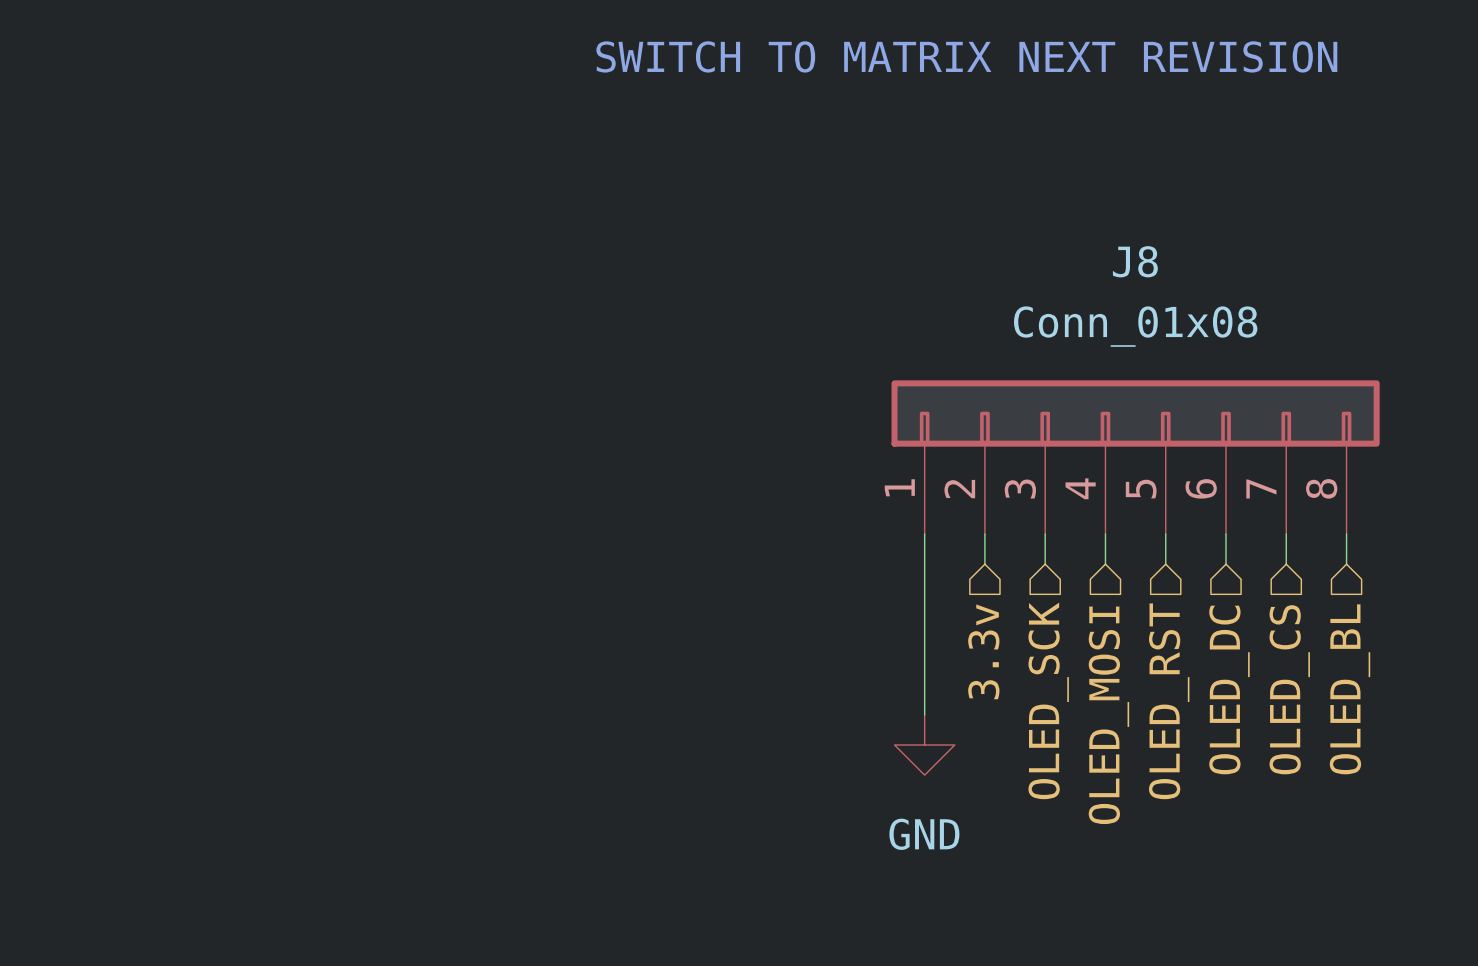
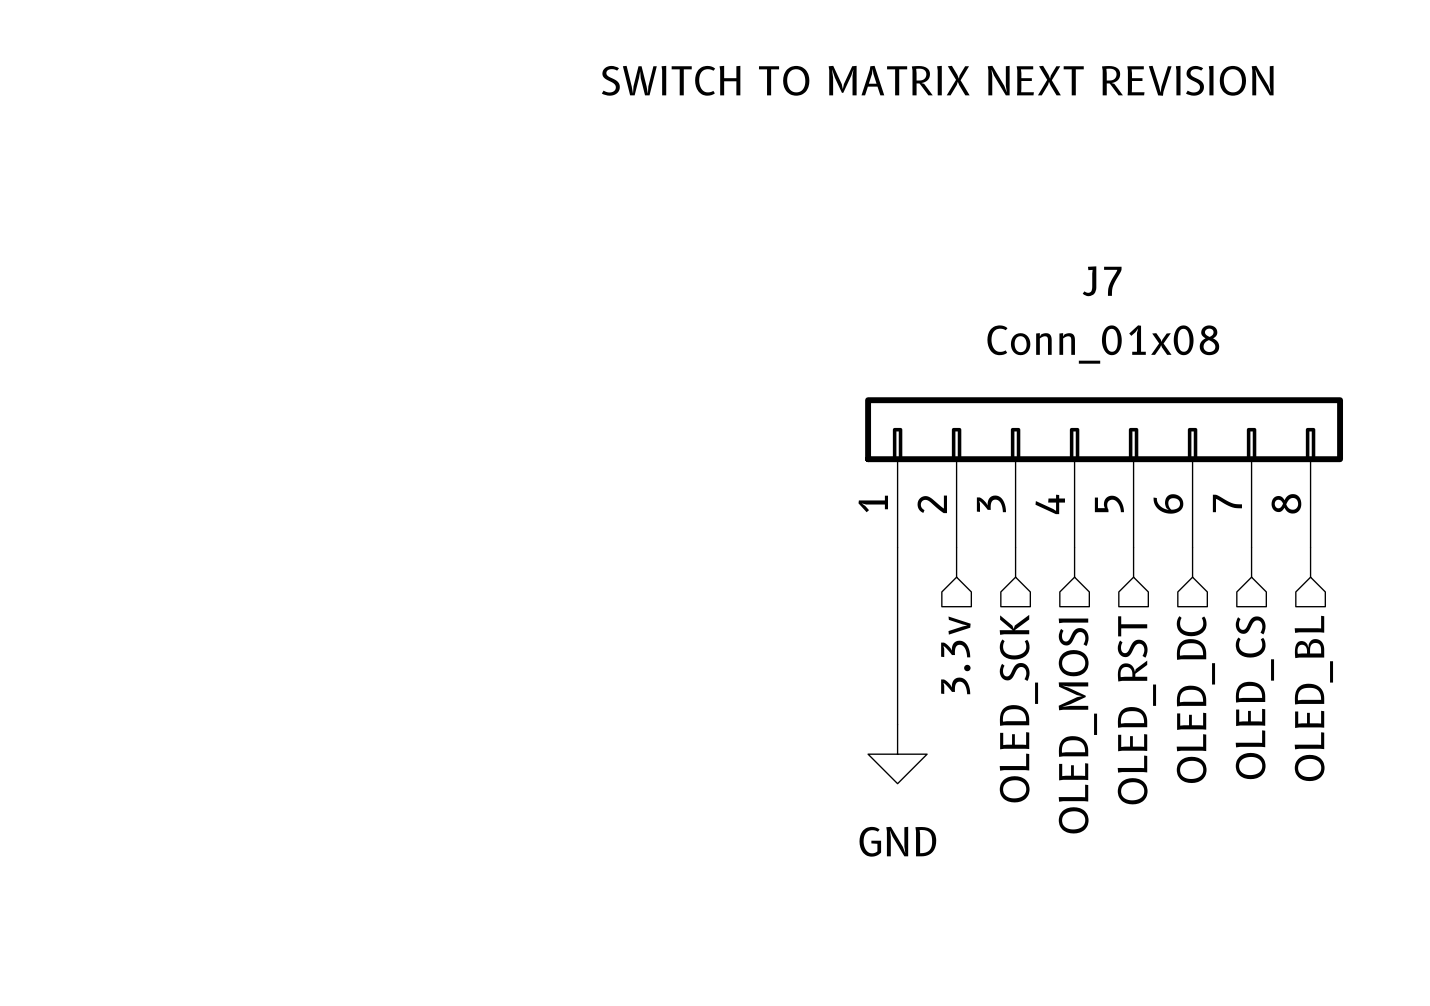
J8 name: J8 (1135, 261) -> J7 (1102, 281)

